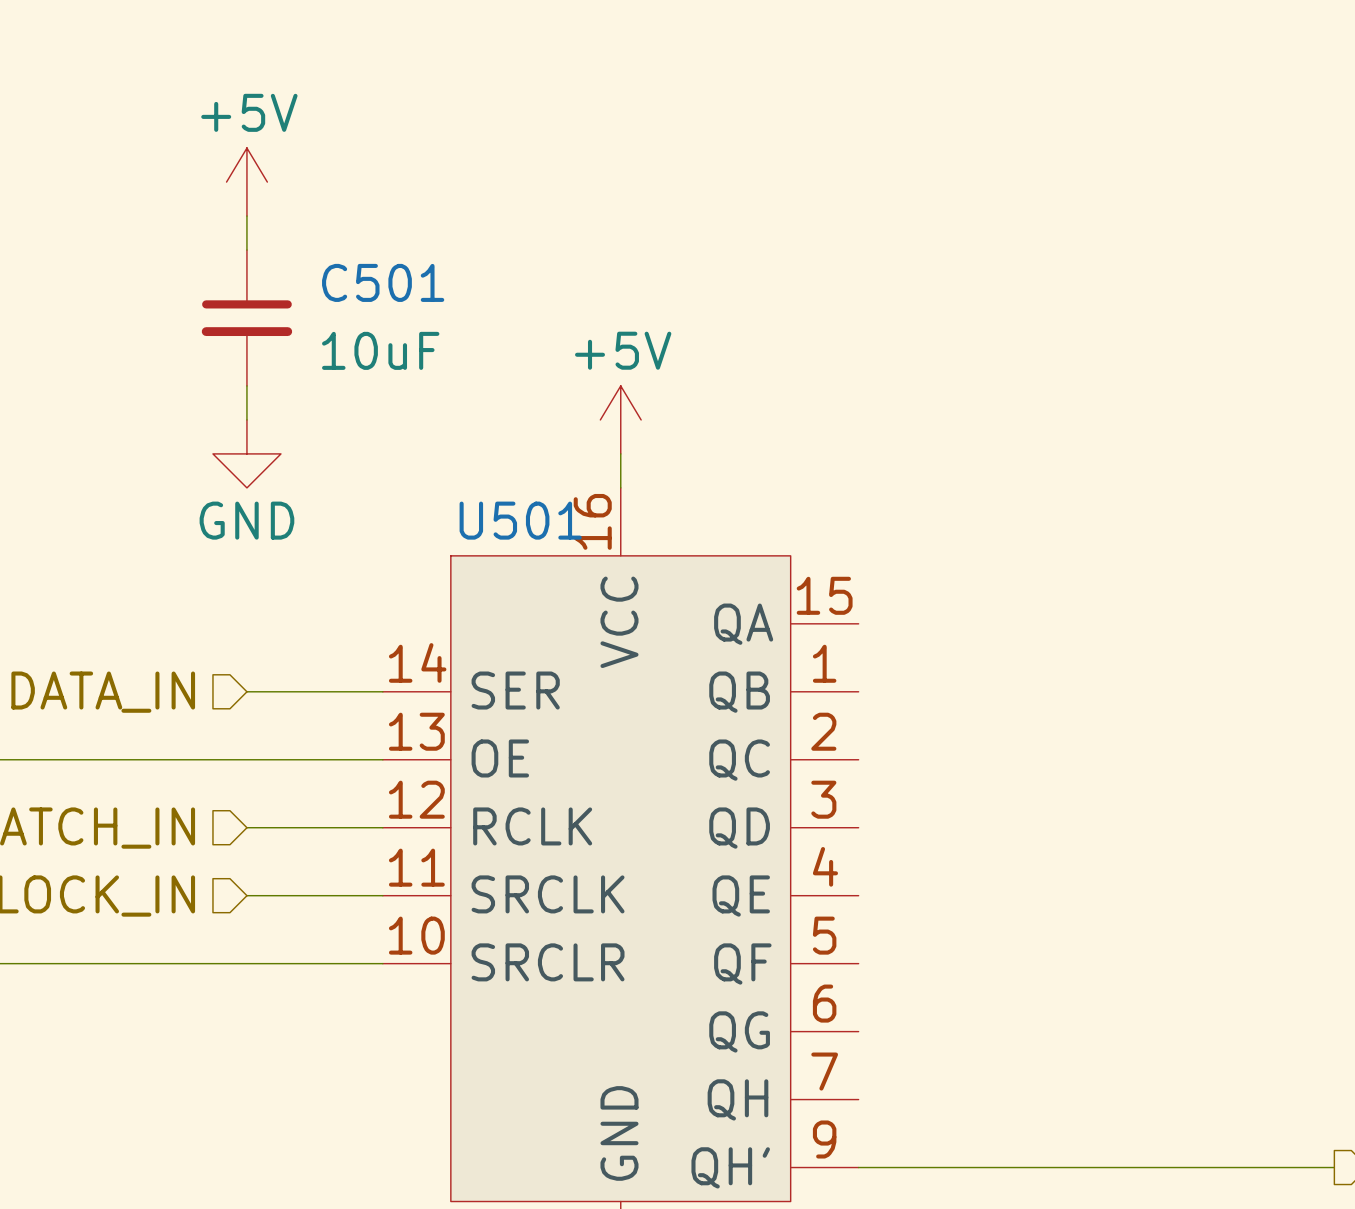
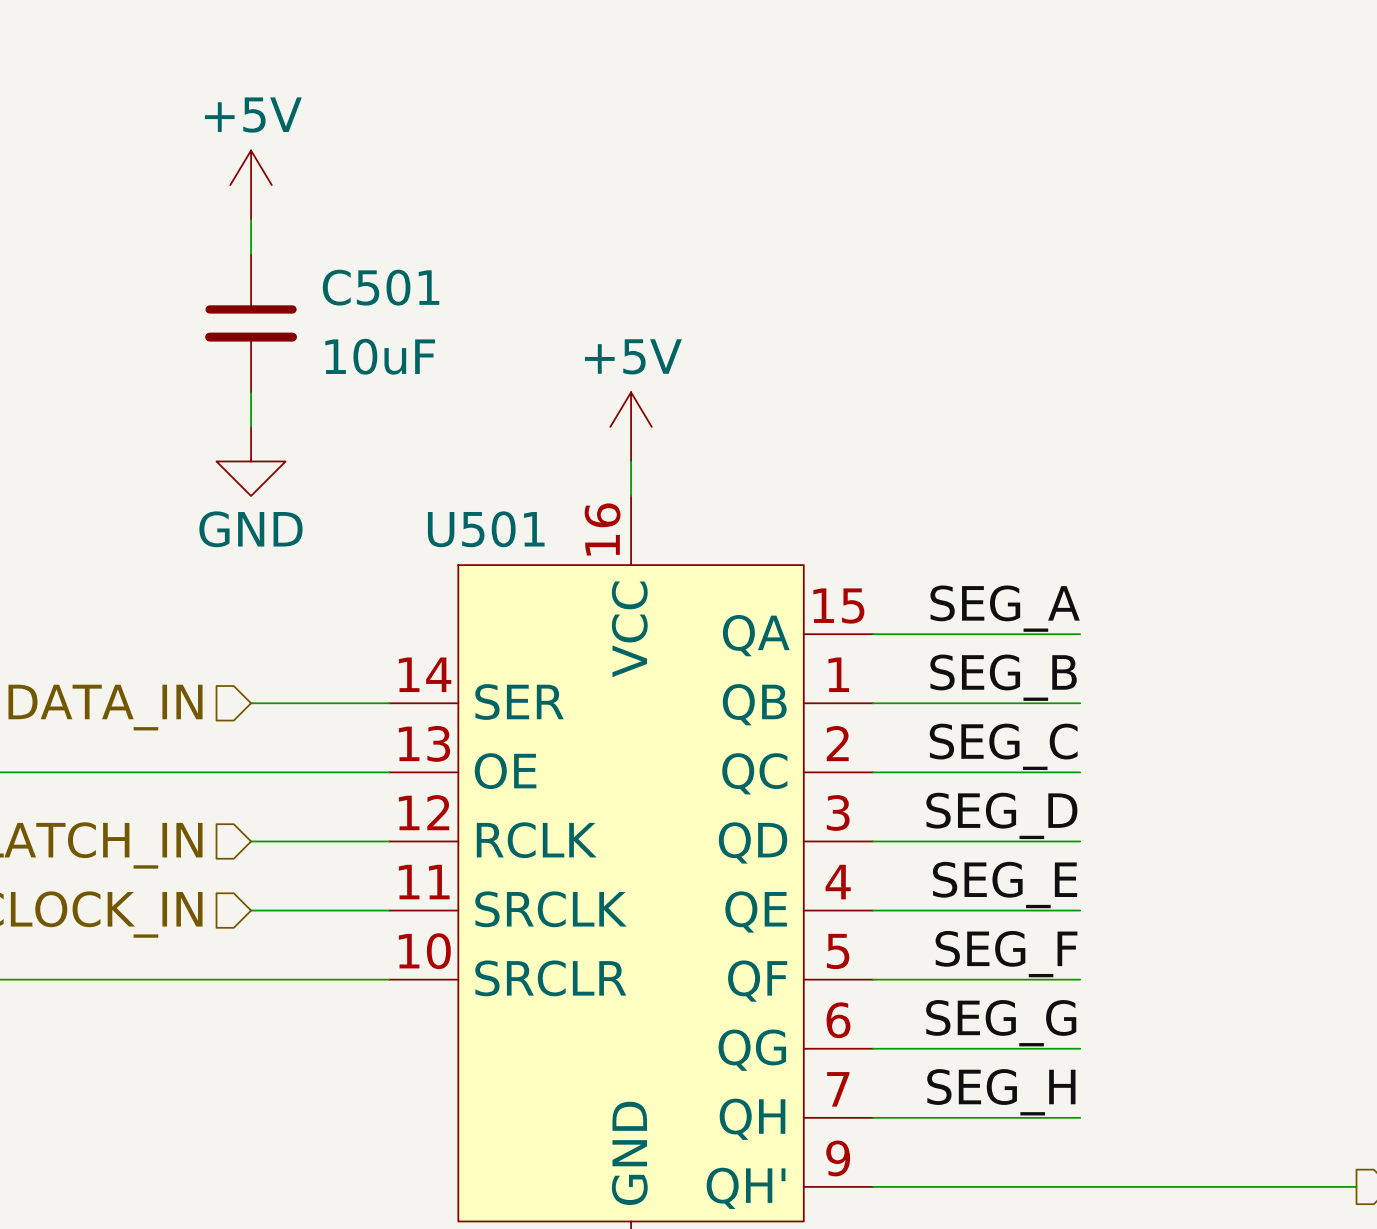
U501 name position: U501 (520, 520) -> U501 (486, 529)
label: none -> SEG_A (1005, 608)
wire: none -> (872, 634) (1080, 634)
label: none -> SEG_B (1003, 677)
wire: none -> (872, 703) (1080, 703)
label: none -> SEG_C (1003, 746)
wire: none -> (872, 772) (1080, 772)
label: none -> SEG_D (1001, 815)
wire: none -> (872, 841) (1080, 841)
label: none -> SEG_E (1005, 885)
wire: none -> (872, 910) (1080, 910)
label: none -> SEG_F (1006, 954)
wire: none -> (872, 979) (1080, 979)
label: none -> SEG_G (1001, 1023)
wire: none -> (872, 1048) (1080, 1048)
label: none -> SEG_H (1001, 1092)
wire: none -> (872, 1117) (1080, 1117)

